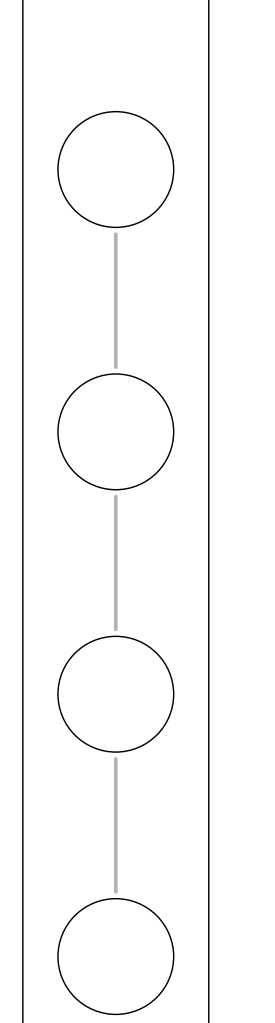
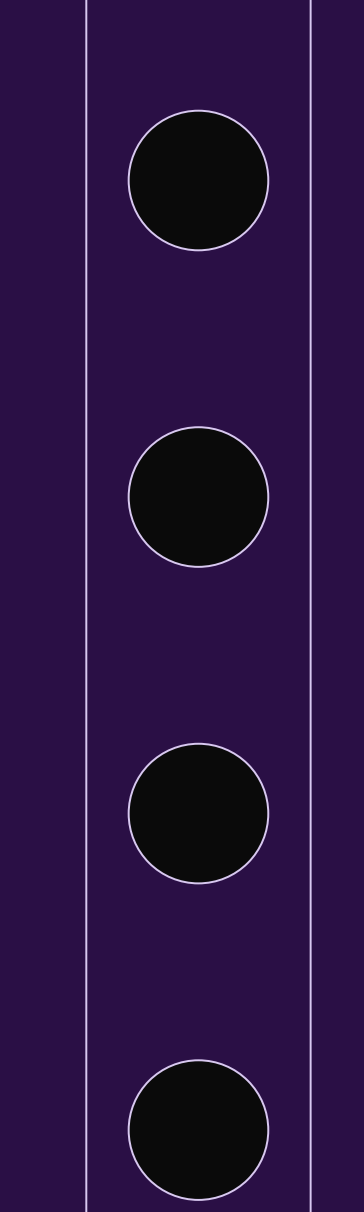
track: (115, 234) (115, 367) -> none
track: (115, 496) (115, 629) -> none
track: (115, 758) (115, 891) -> none

